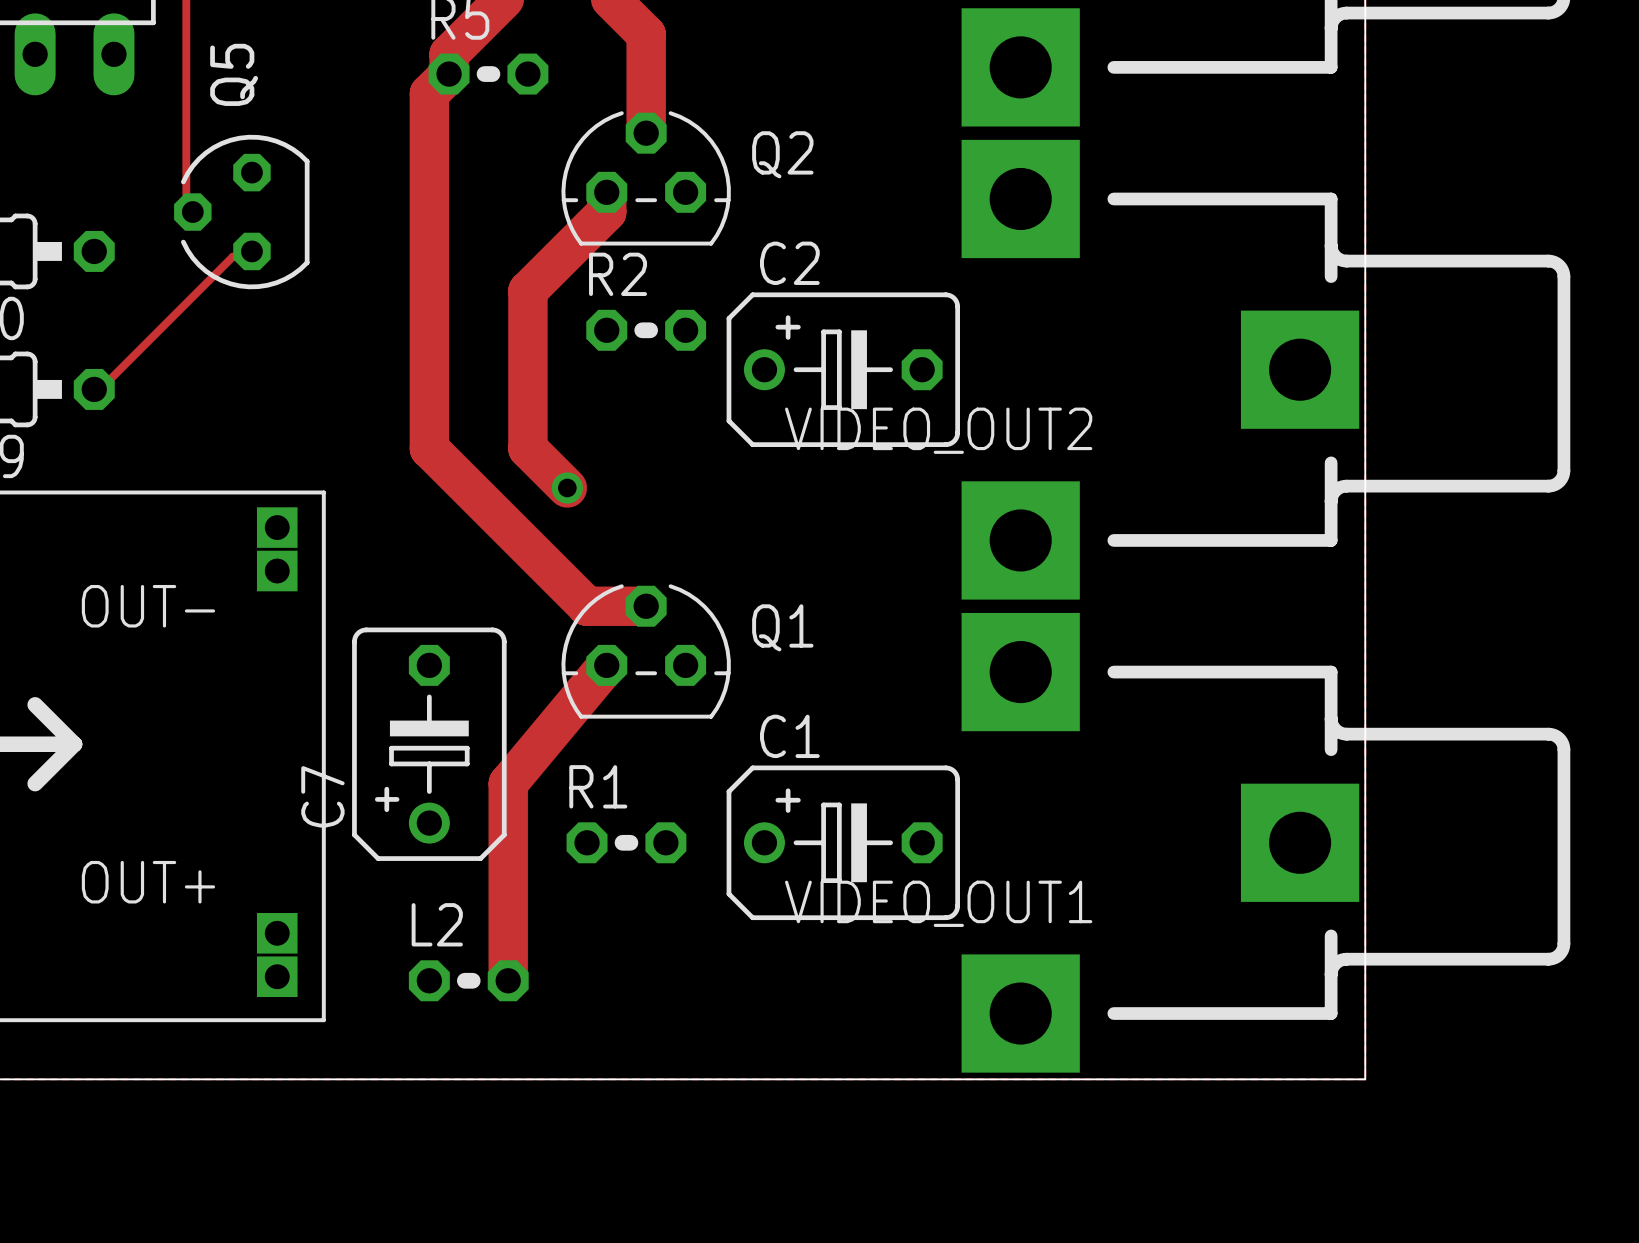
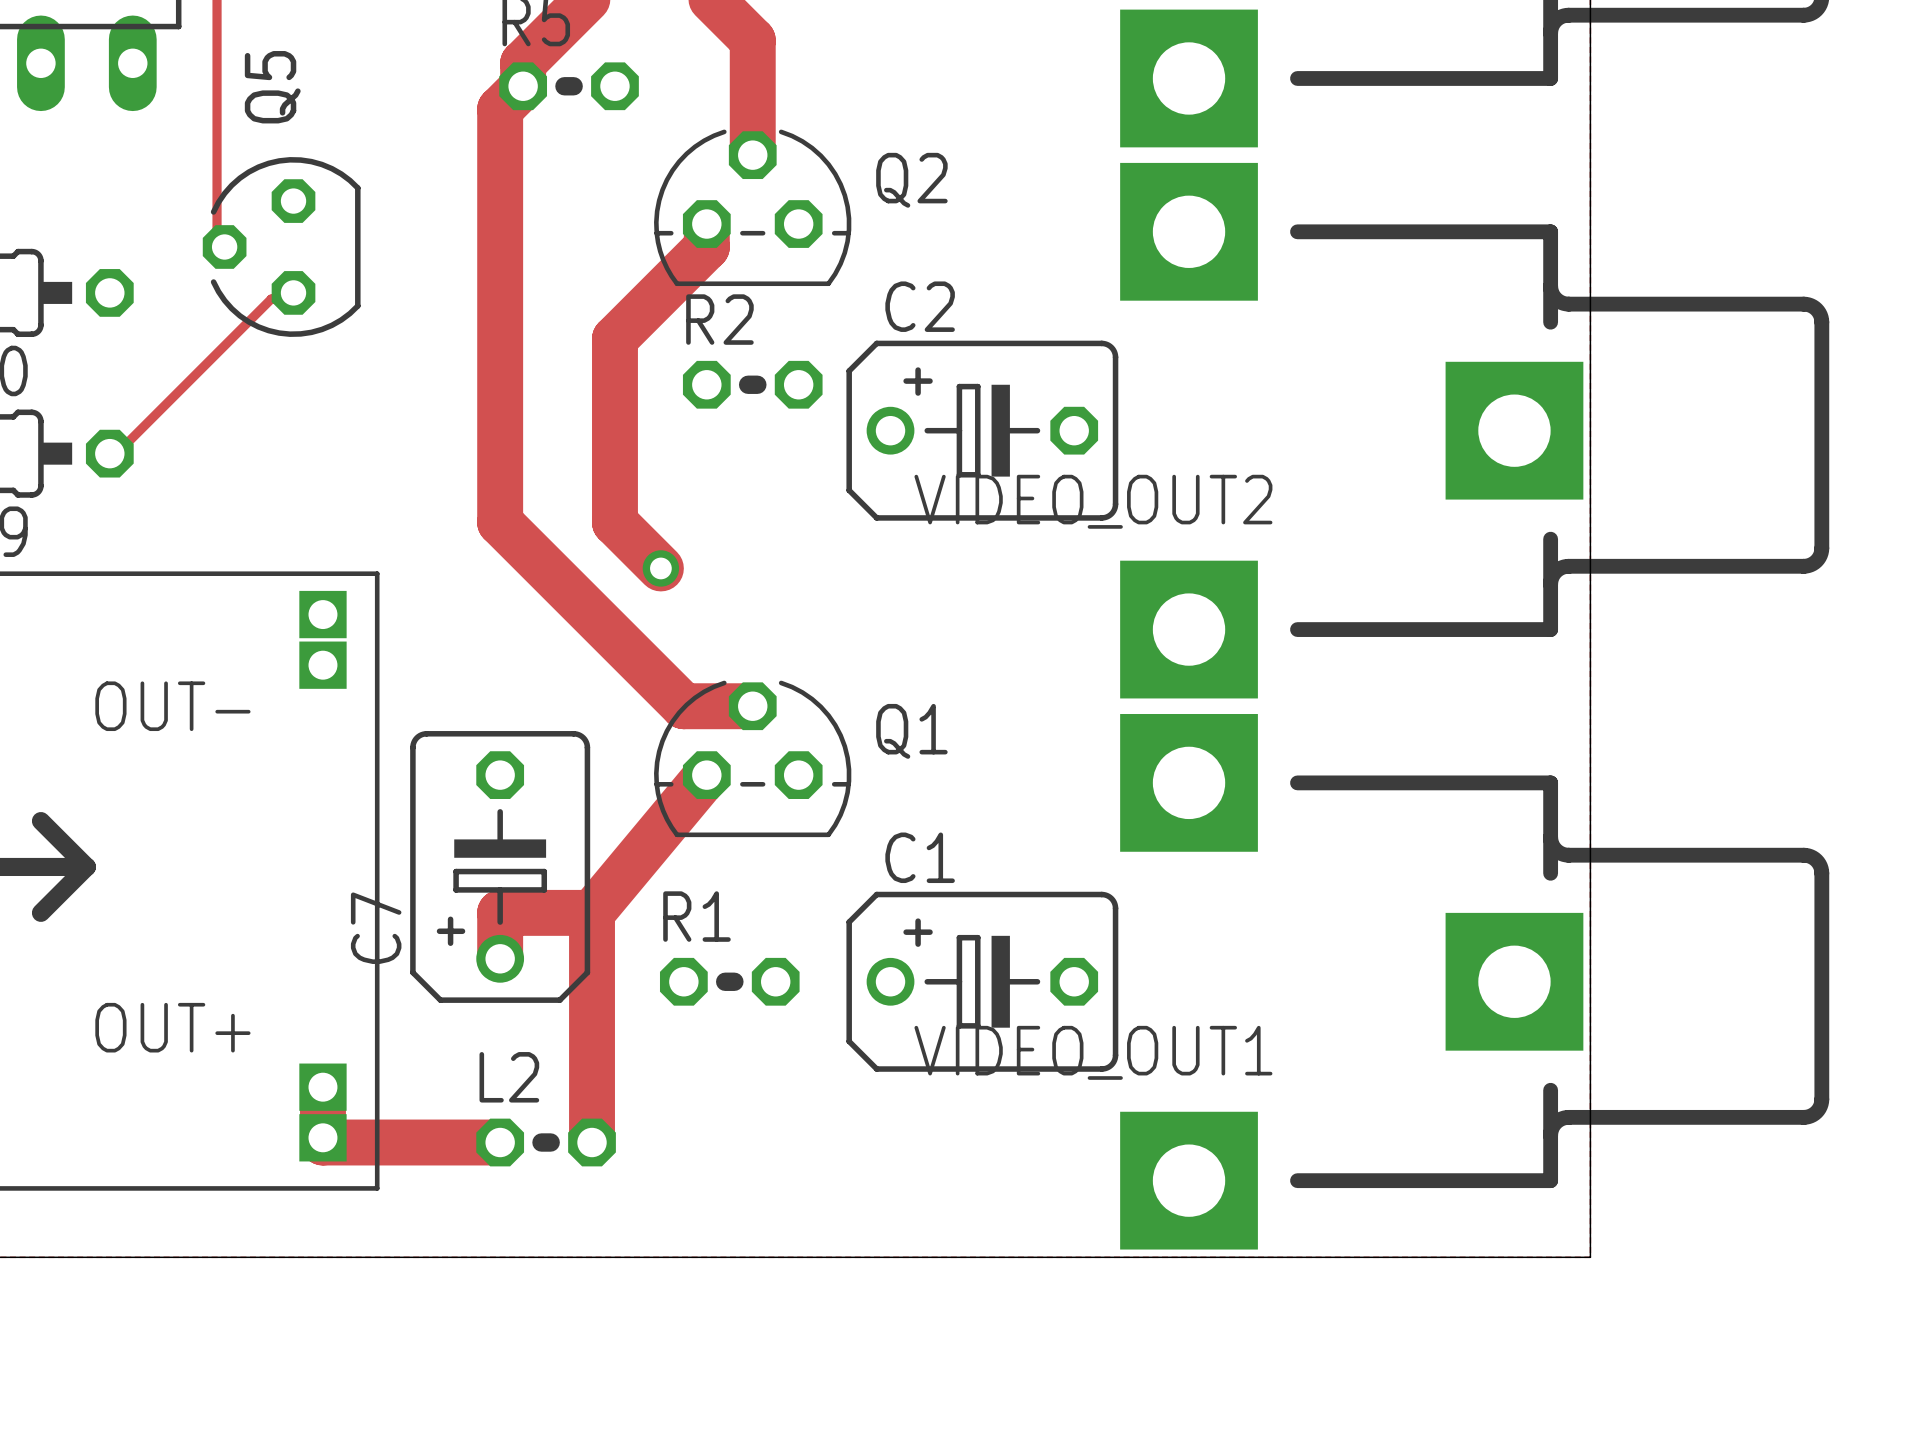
track: none -> (592, 912) (500, 912) (500, 958)
track: none -> (322, 1087) (322, 1142) (500, 1142)

